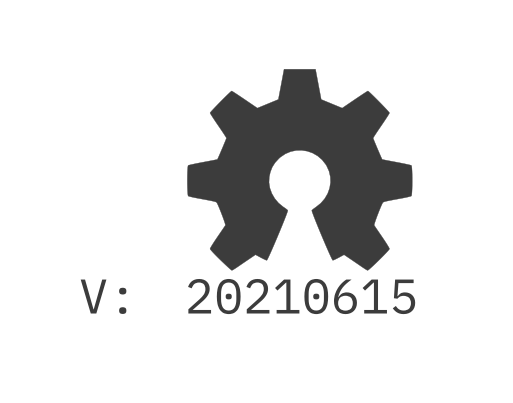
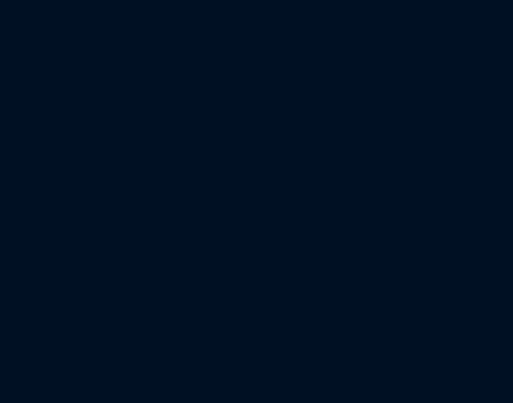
drawing: [187, 69, 413, 271] -> none

